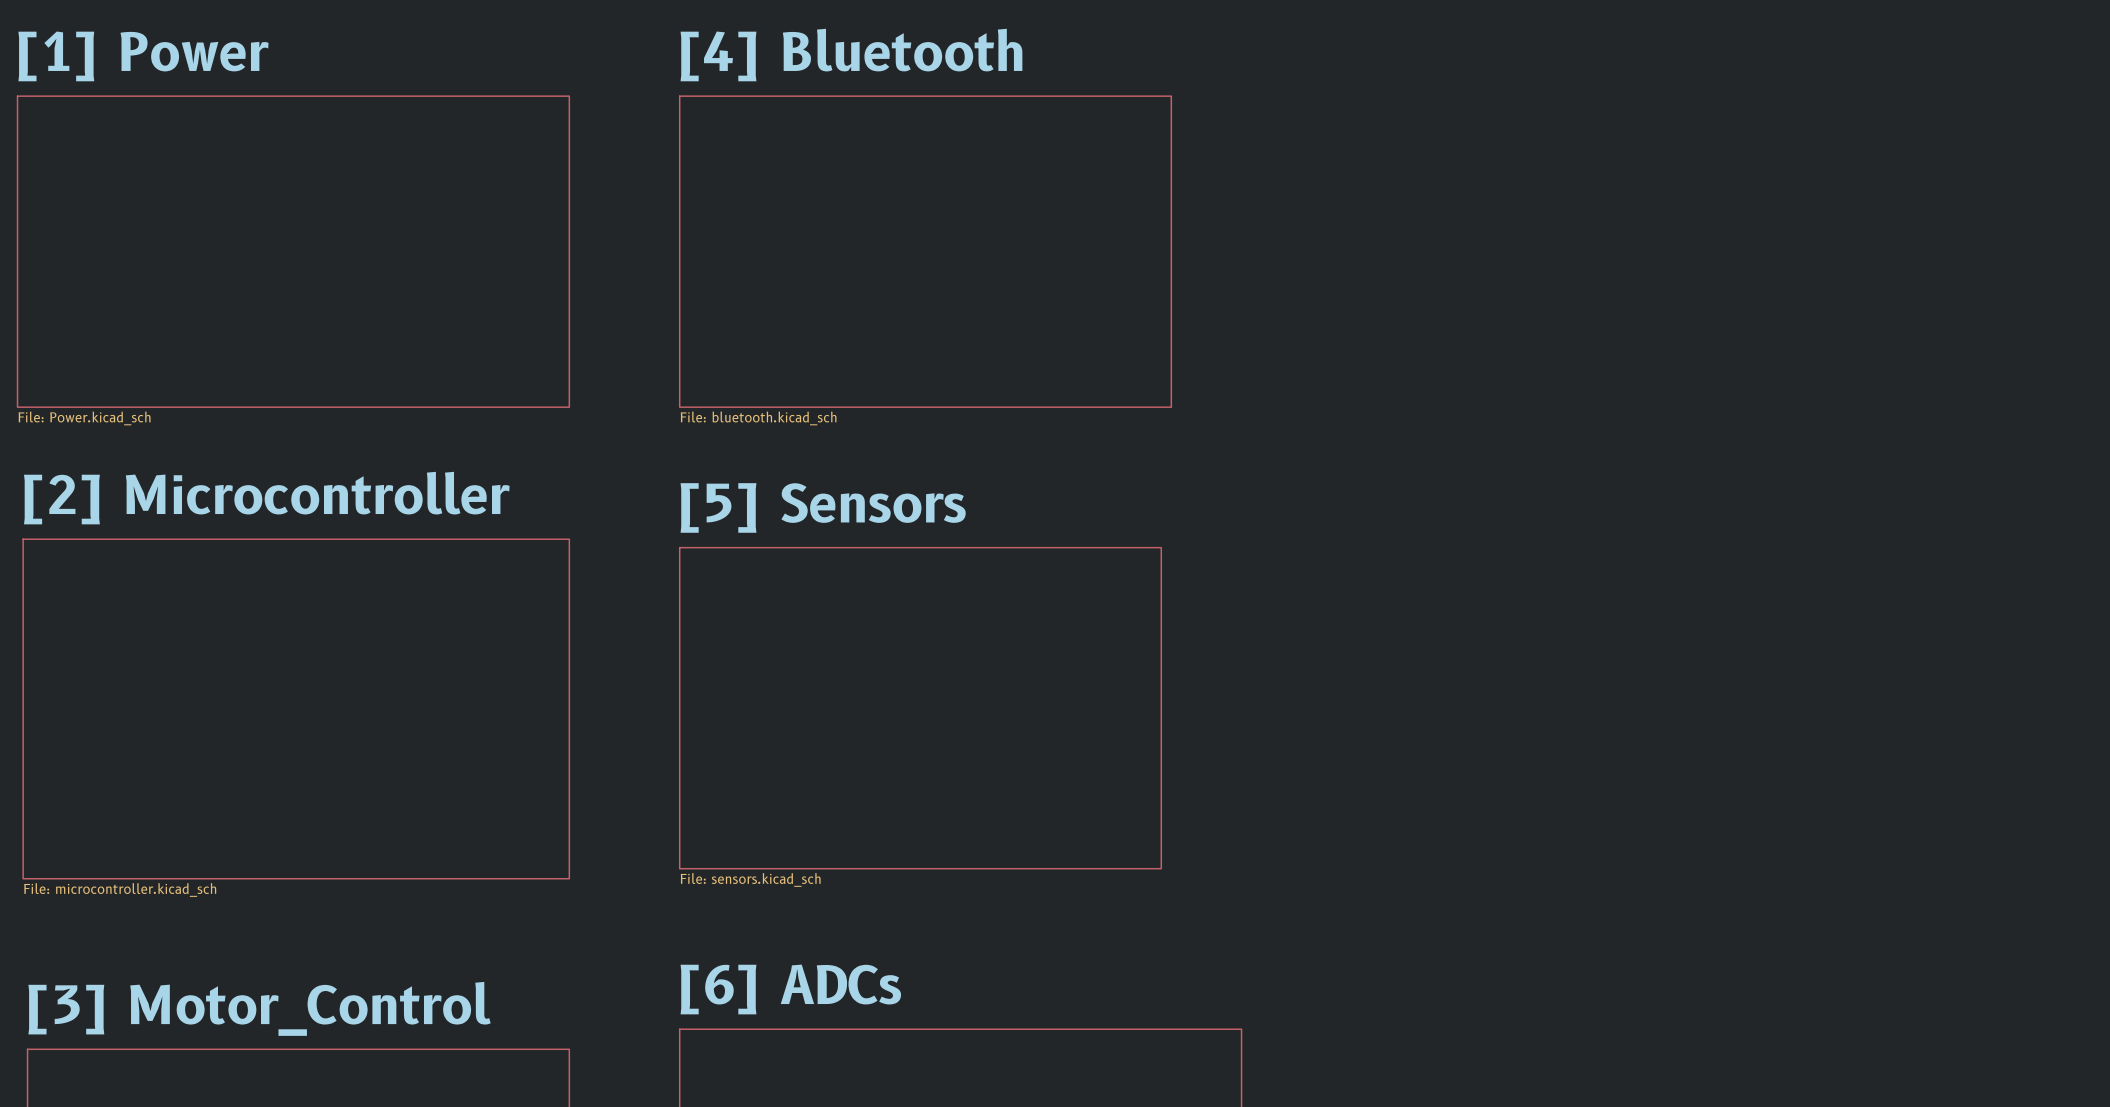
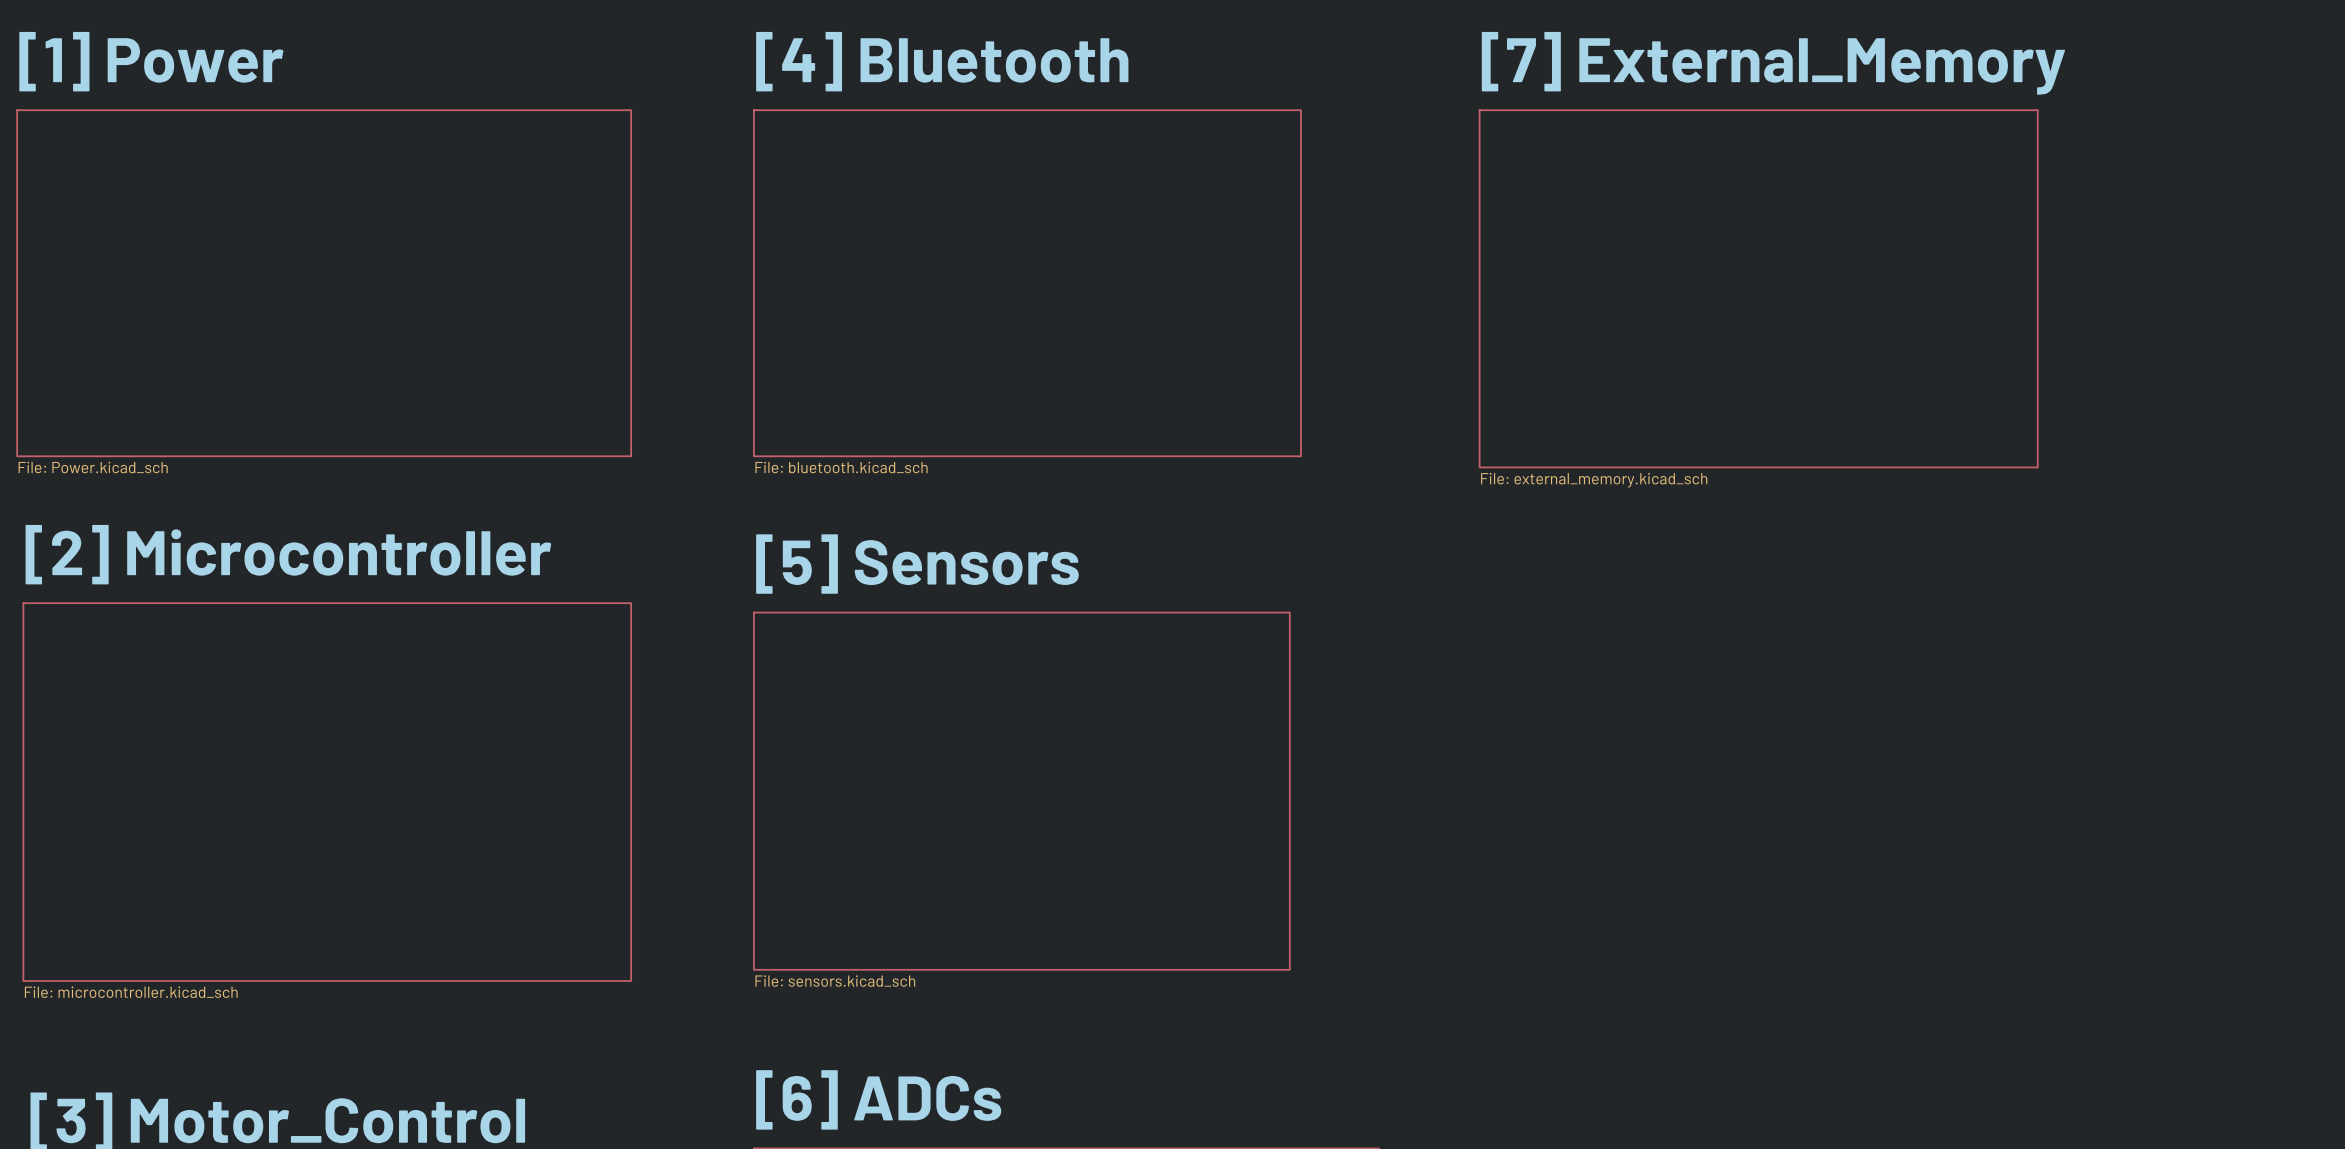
sheet [7] External_Memory: none -> File: external_memory.kicad_sch (1758, 288)

